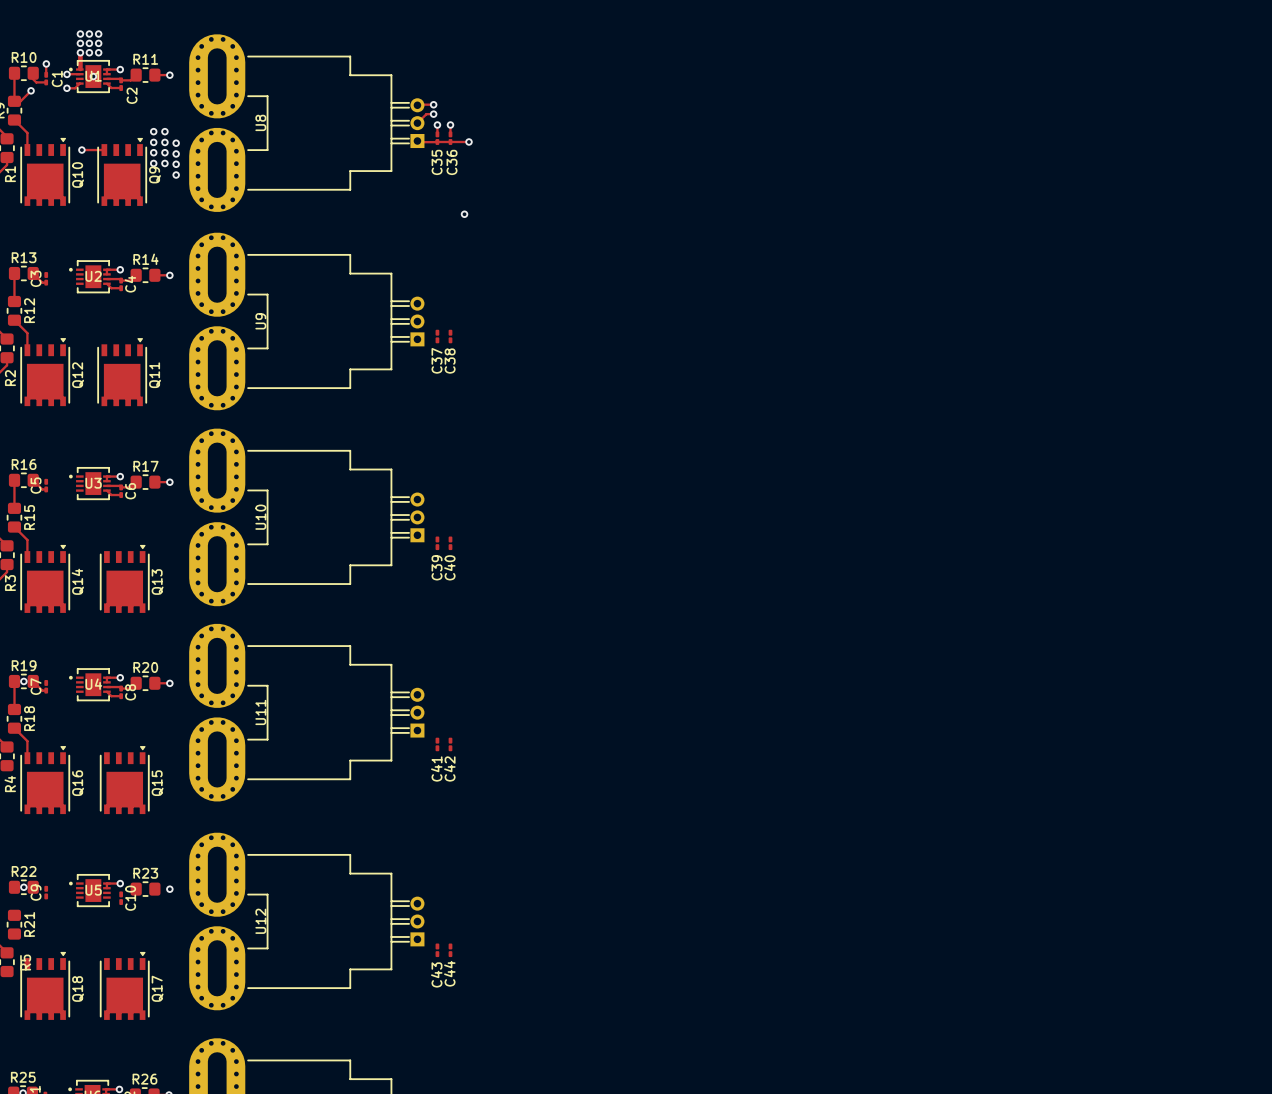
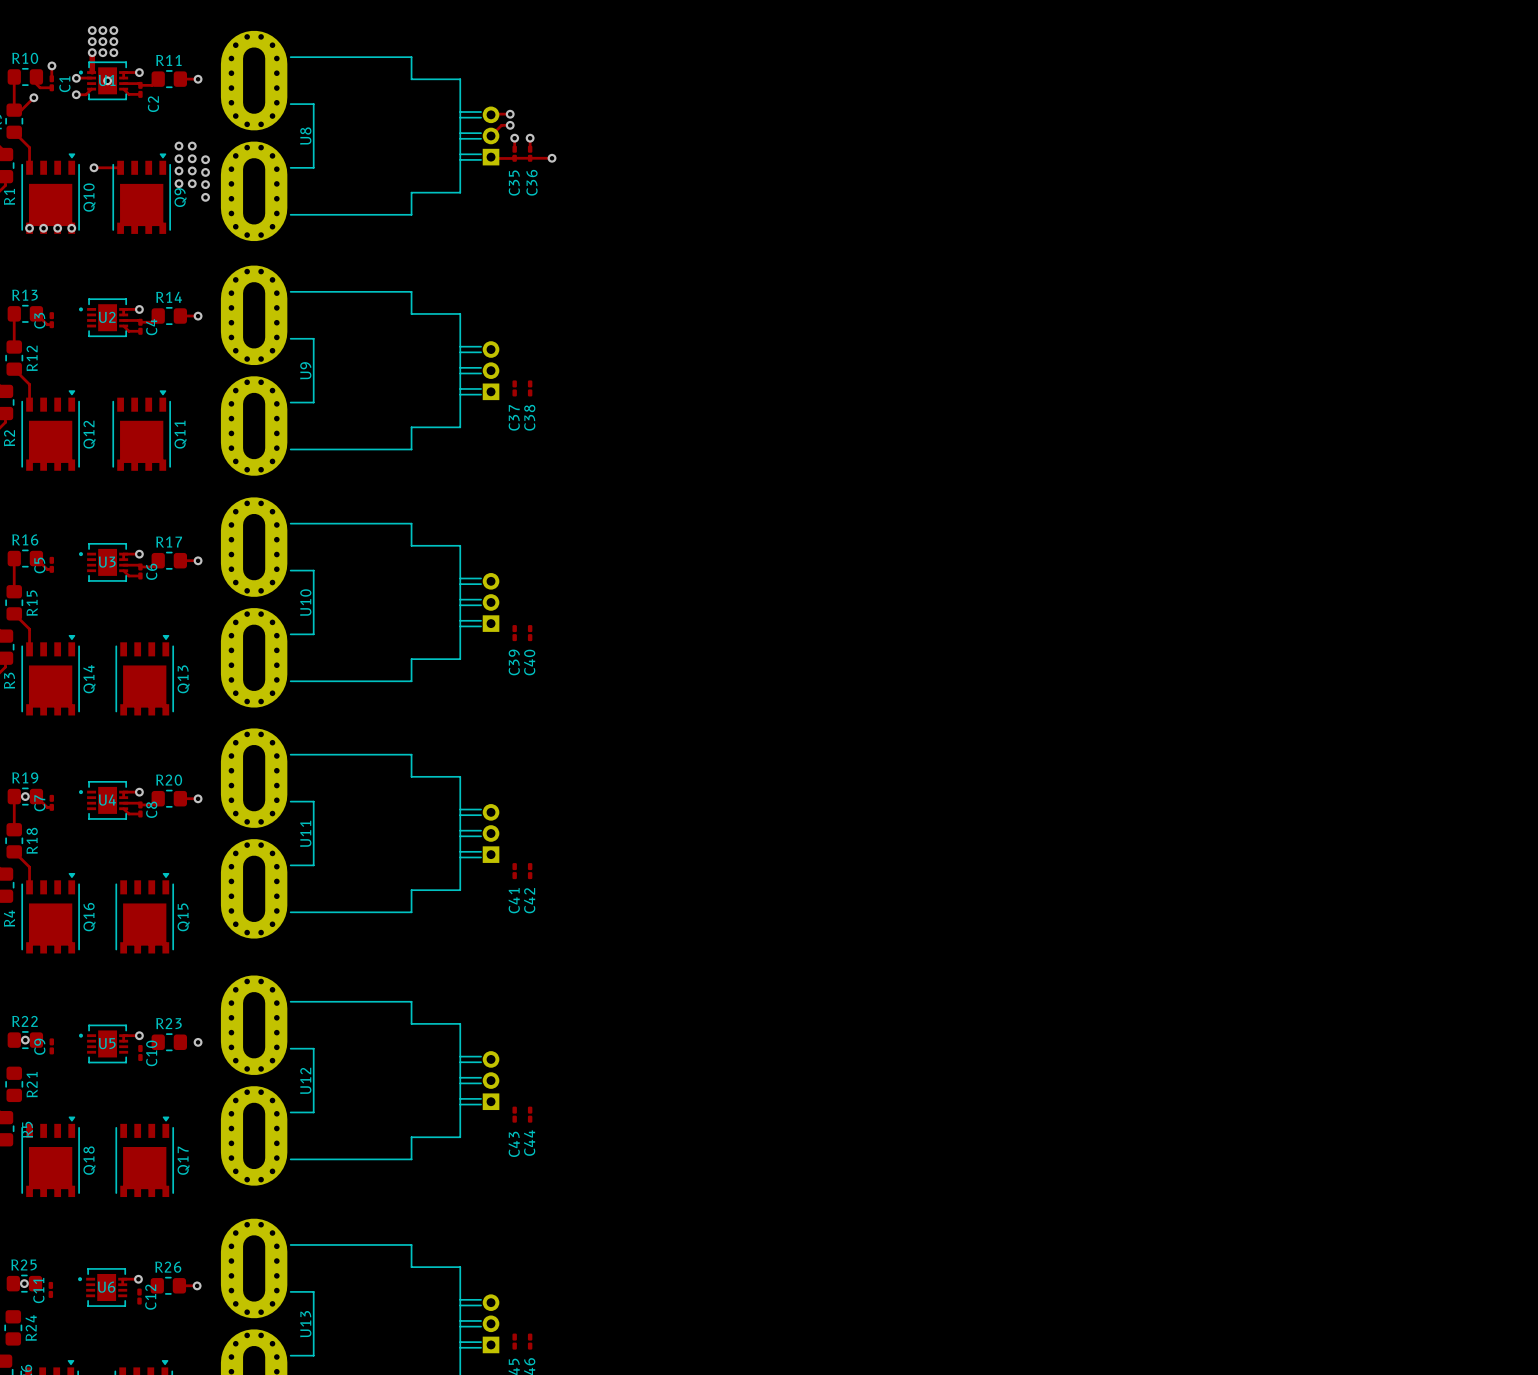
via: none -> (29, 228)
via: none -> (43, 228)
via: none -> (57, 228)
via: none -> (71, 228)
via: (464, 214) -> none

